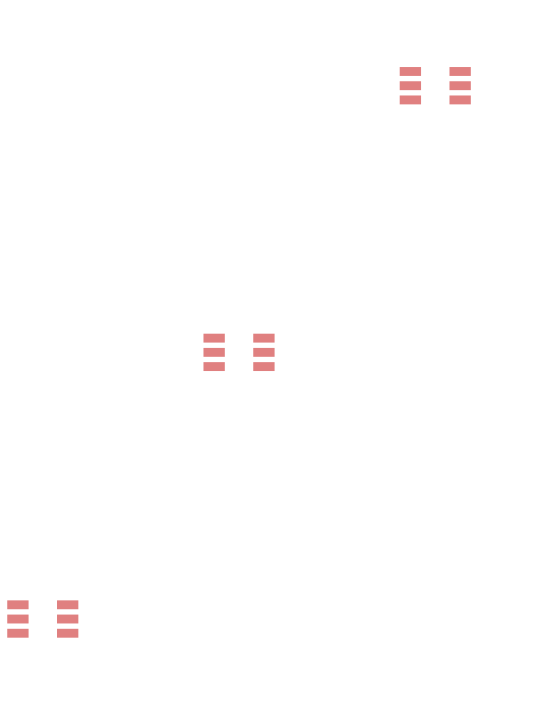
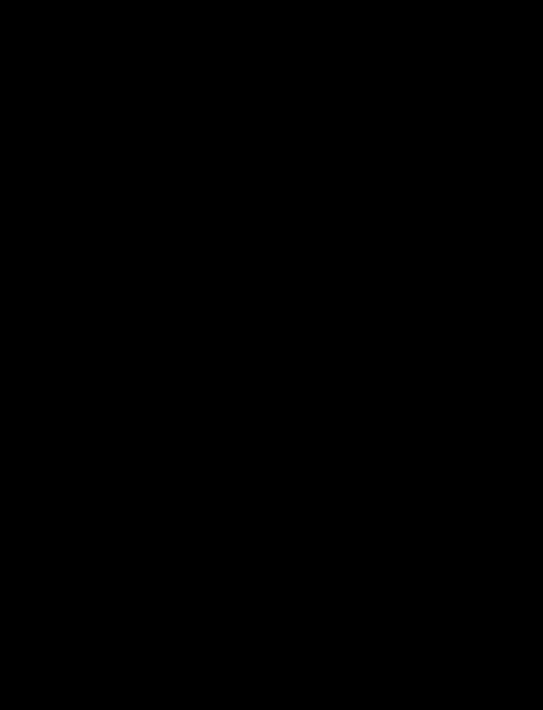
part: (435, 85) -> none
part: (239, 352) -> none
part: (42, 619) -> none

